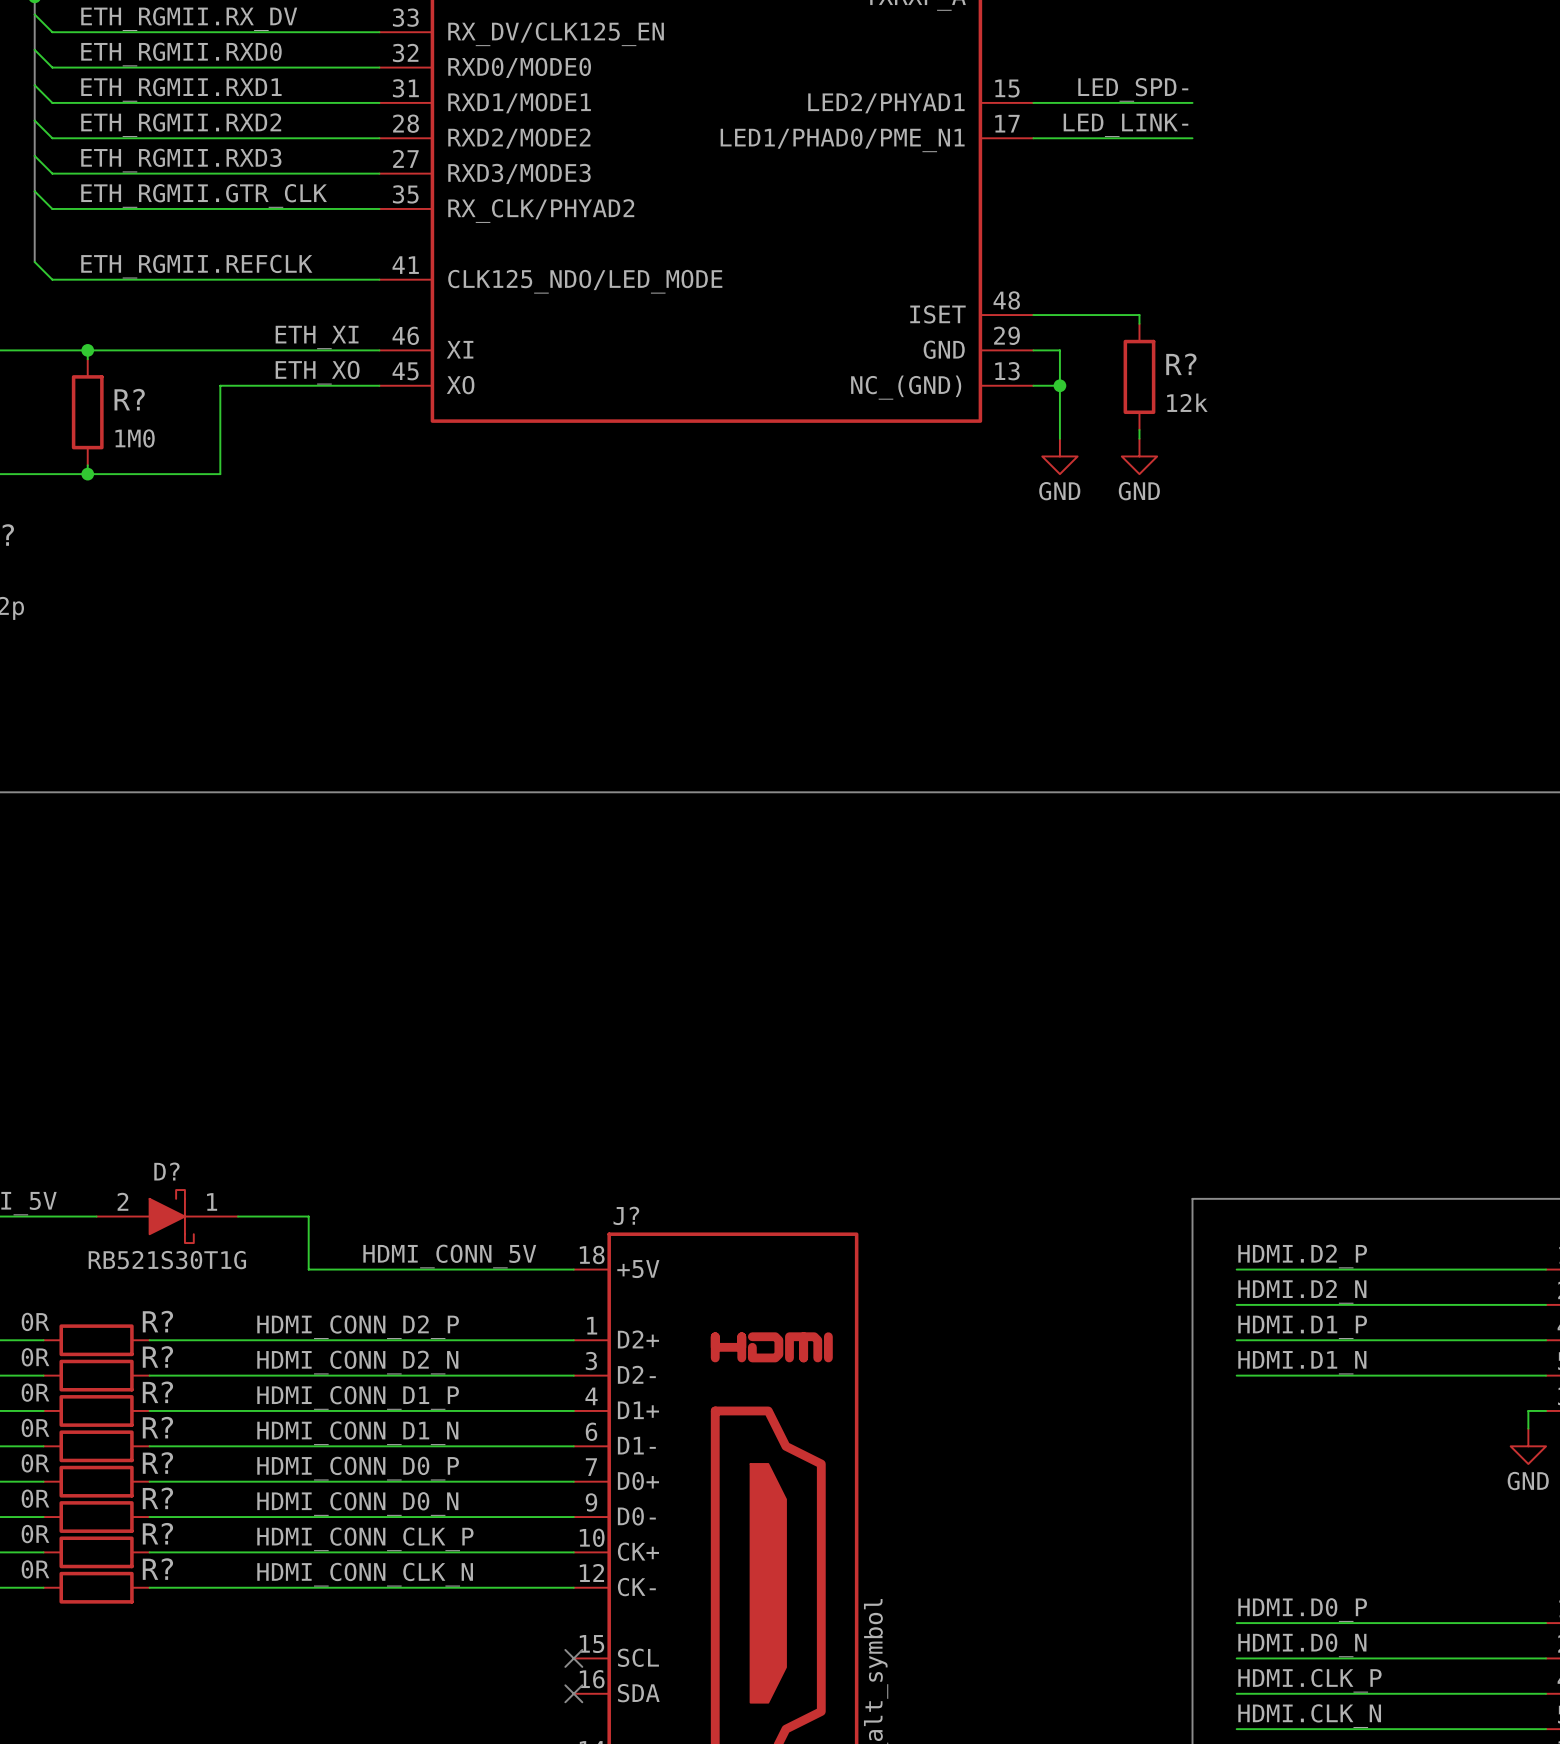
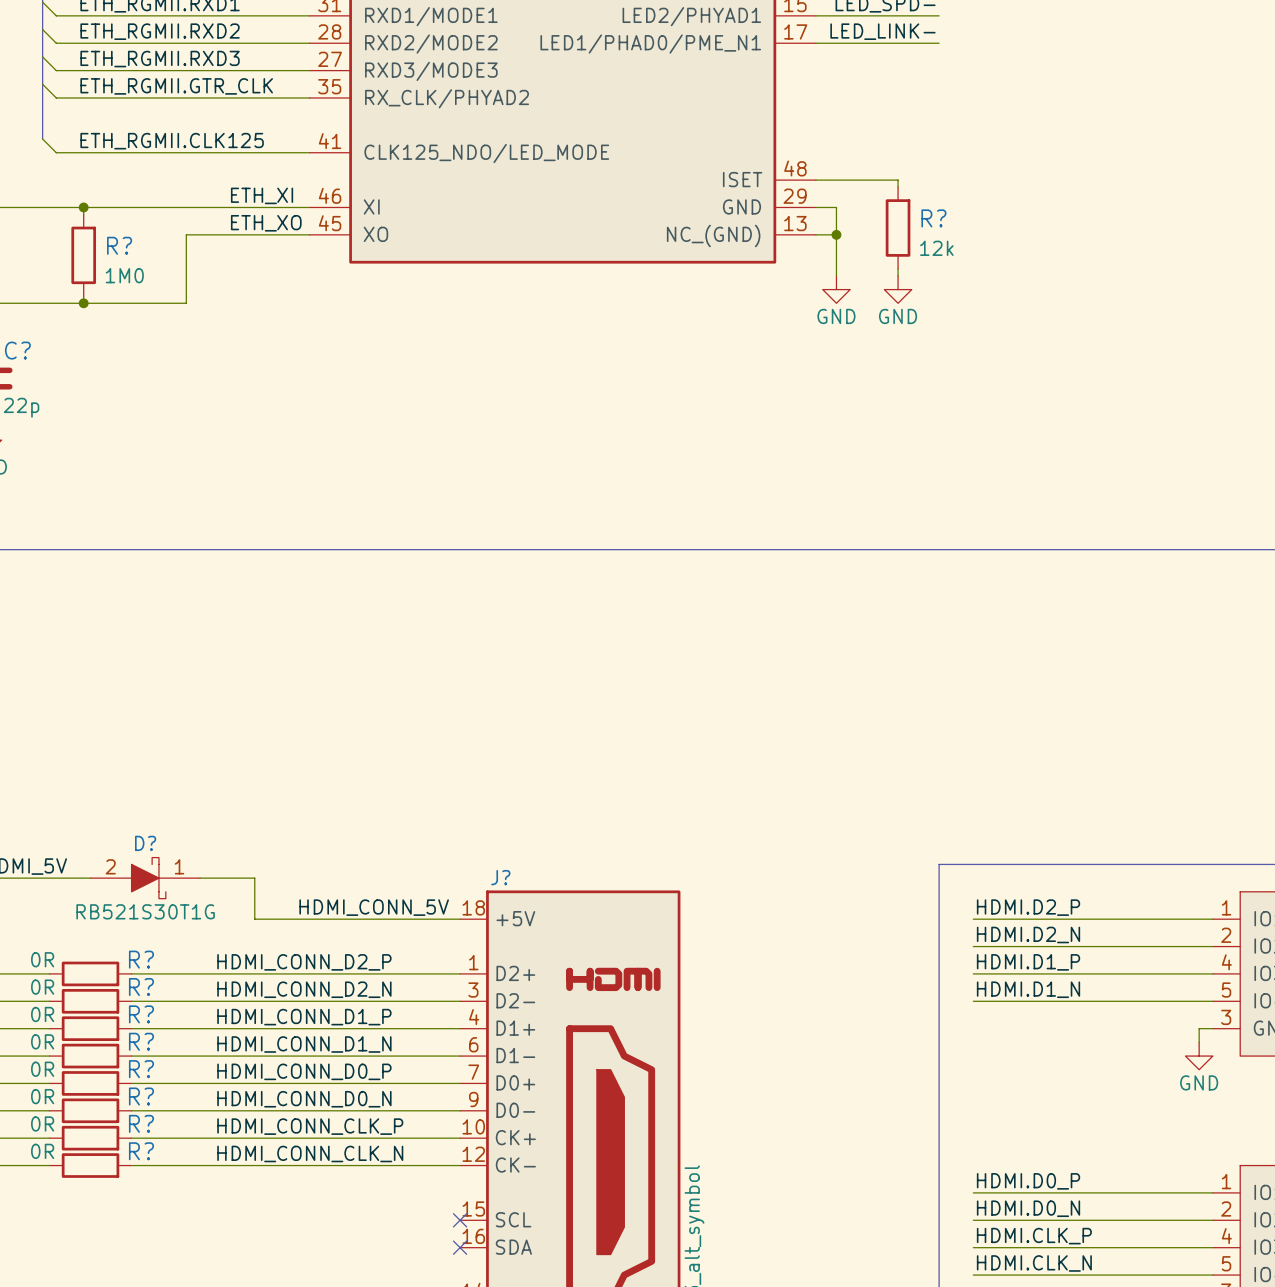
label: ETH_RGMII.REFCLK (196, 266) -> ETH_RGMII.CLK125 (172, 141)

